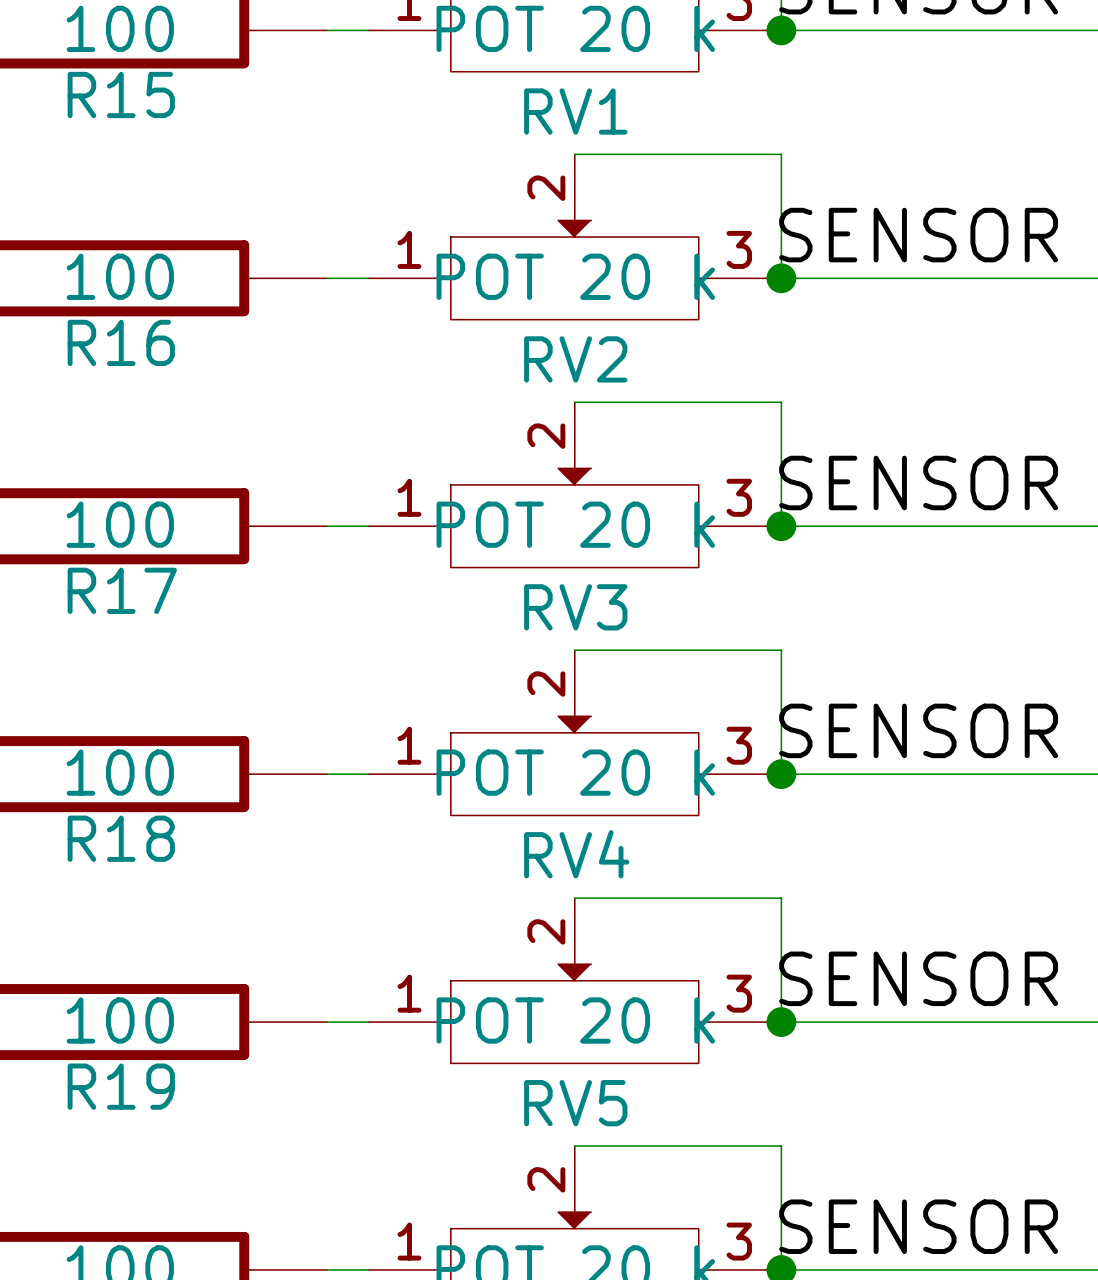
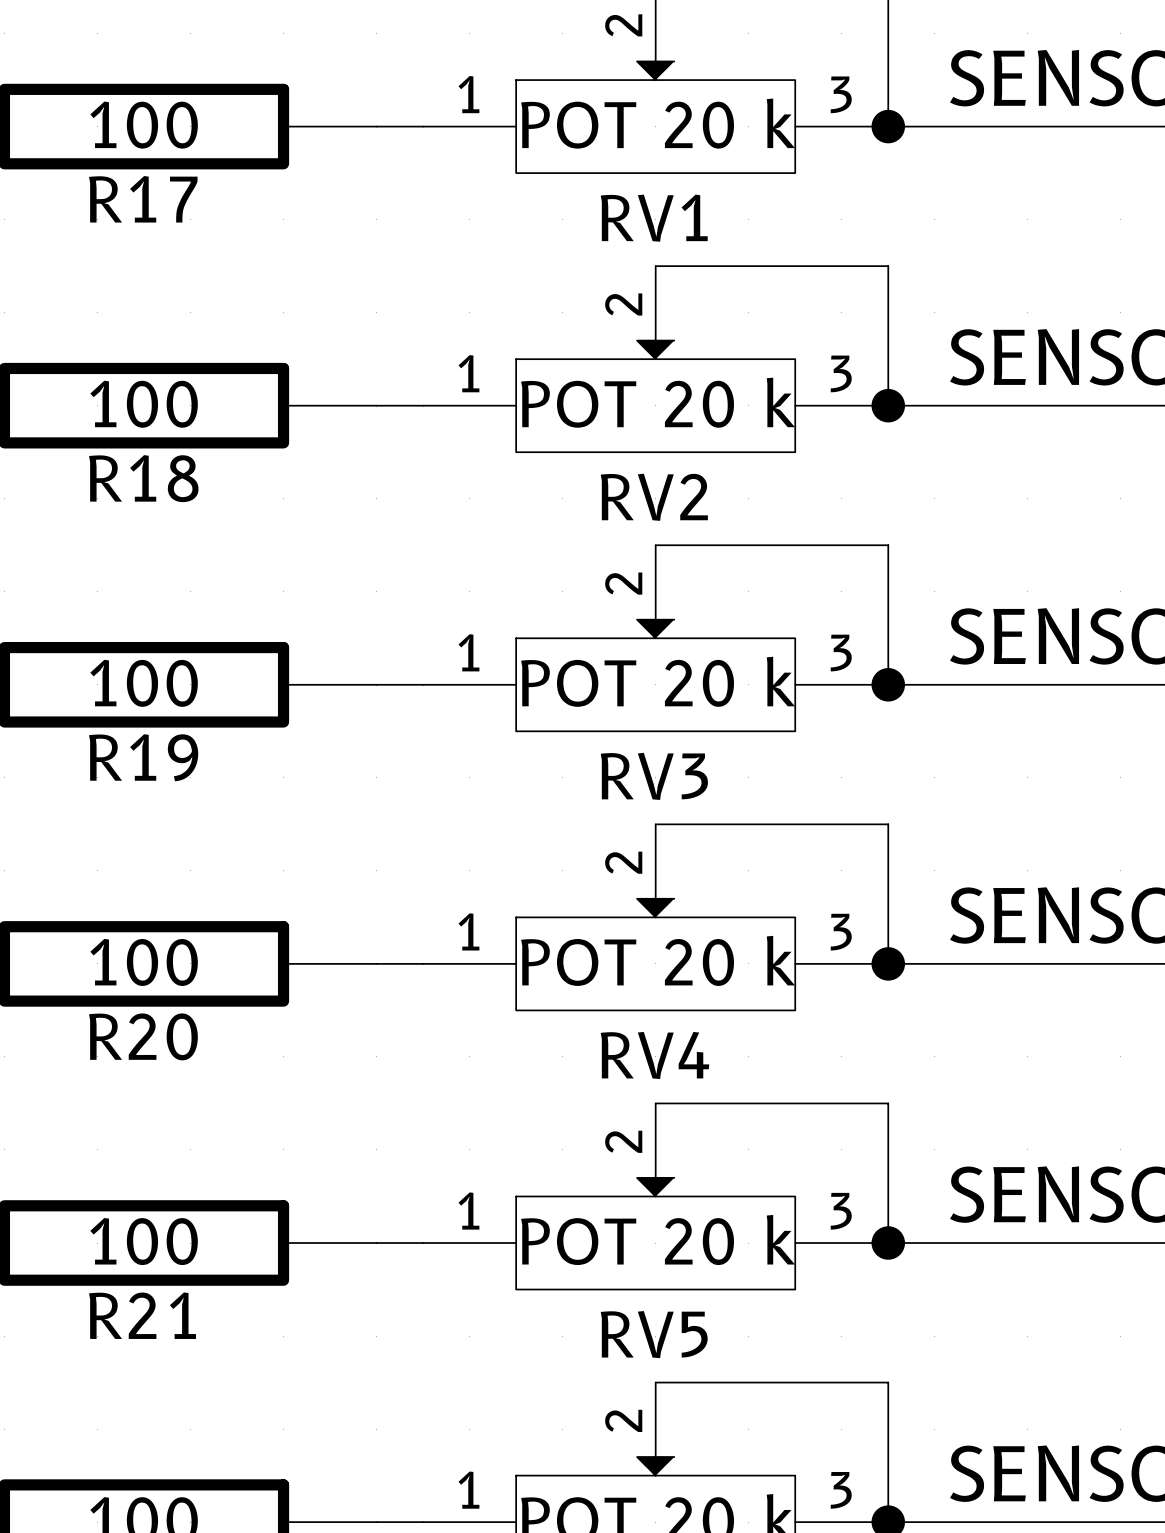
R15 name: R15 (121, 94) -> R17 (143, 199)
R16 name: R16 (121, 342) -> R18 (143, 478)
R17 name: R17 (122, 590) -> R19 (143, 757)
R18 name: R18 (121, 838) -> R20 (143, 1036)
R19 name: R19 (121, 1086) -> R21 (142, 1315)

